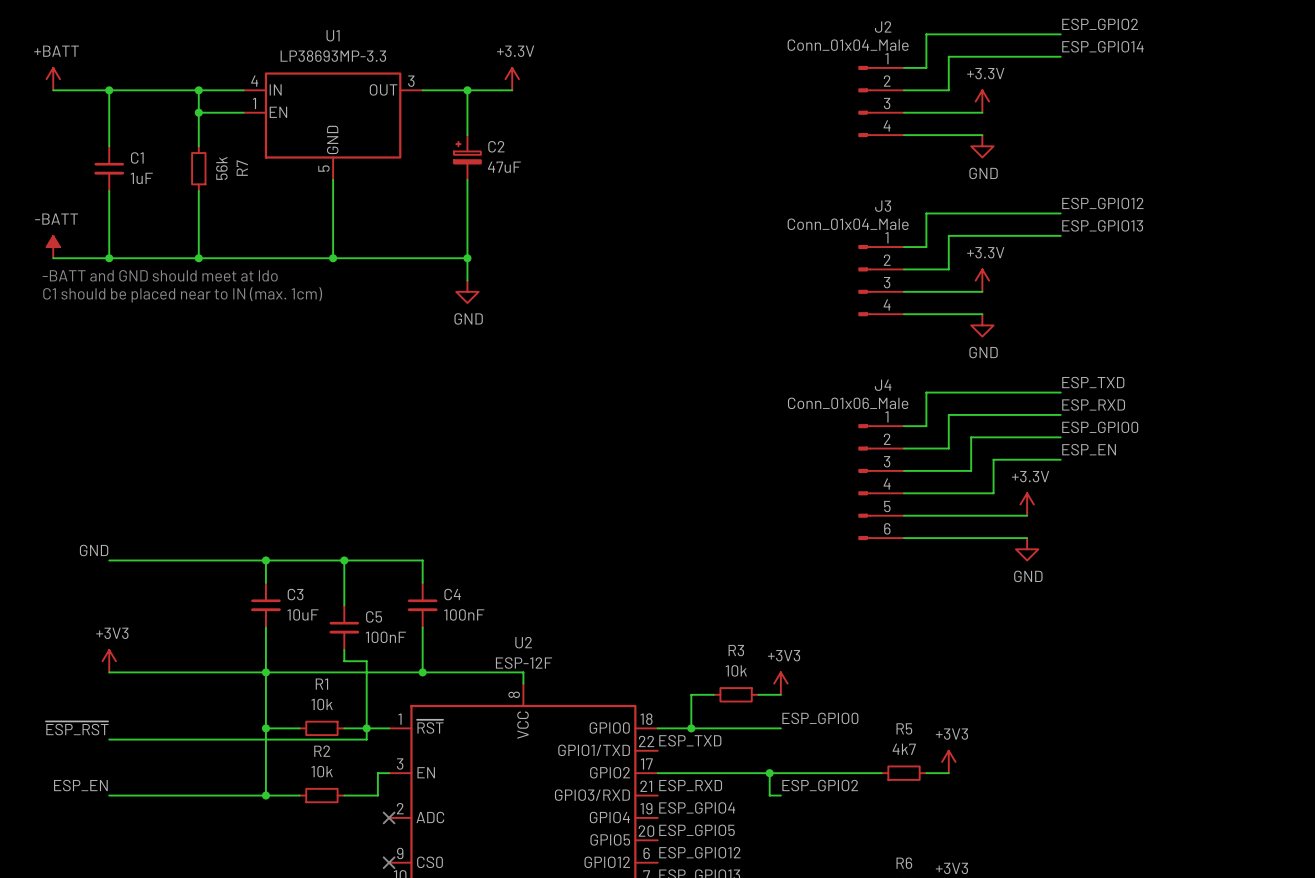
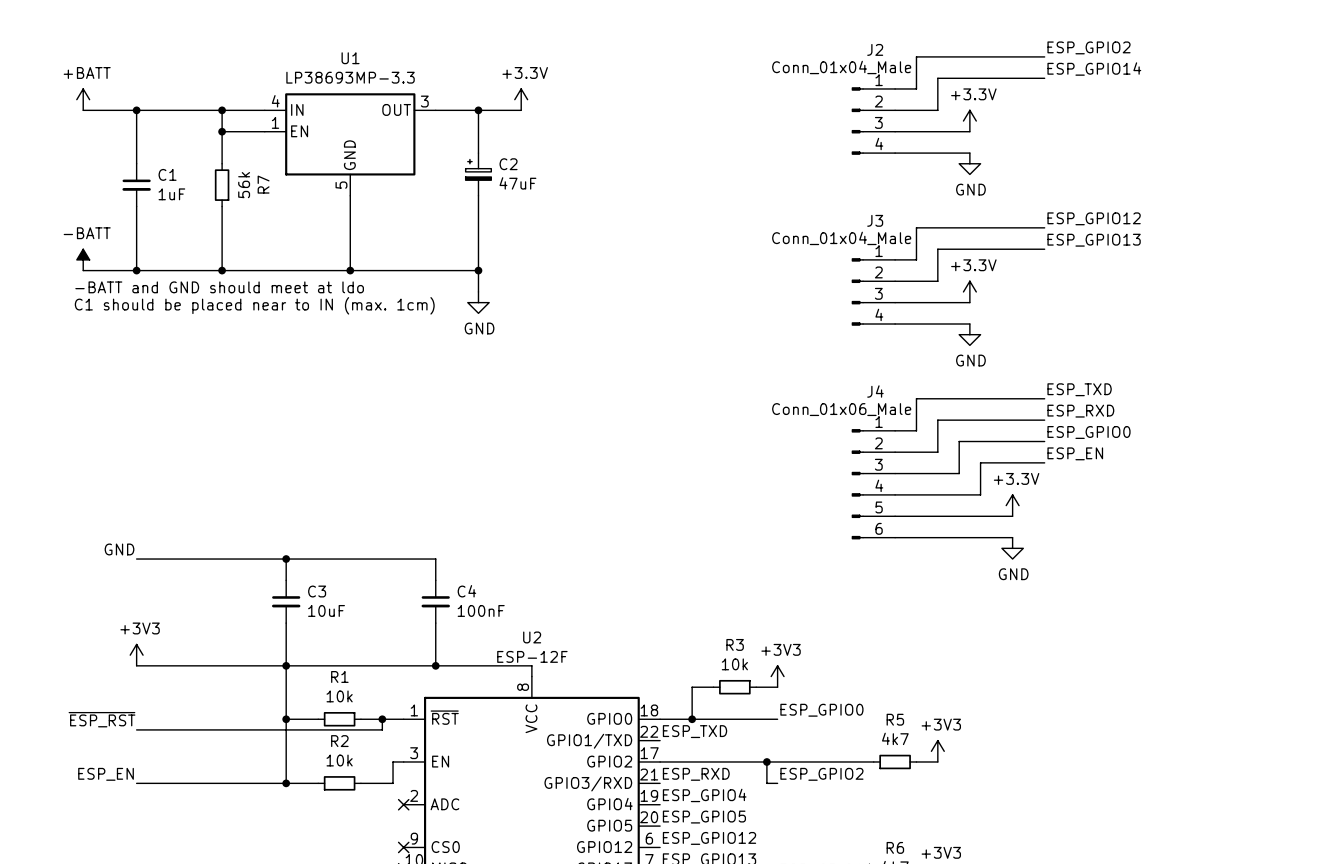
wire: (344, 560) (344, 605) -> none
junction: (344, 560) -> none
C5: 100nF (344, 627) -> none
wire: (344, 650) (344, 661) (366, 661) (366, 728) -> none

